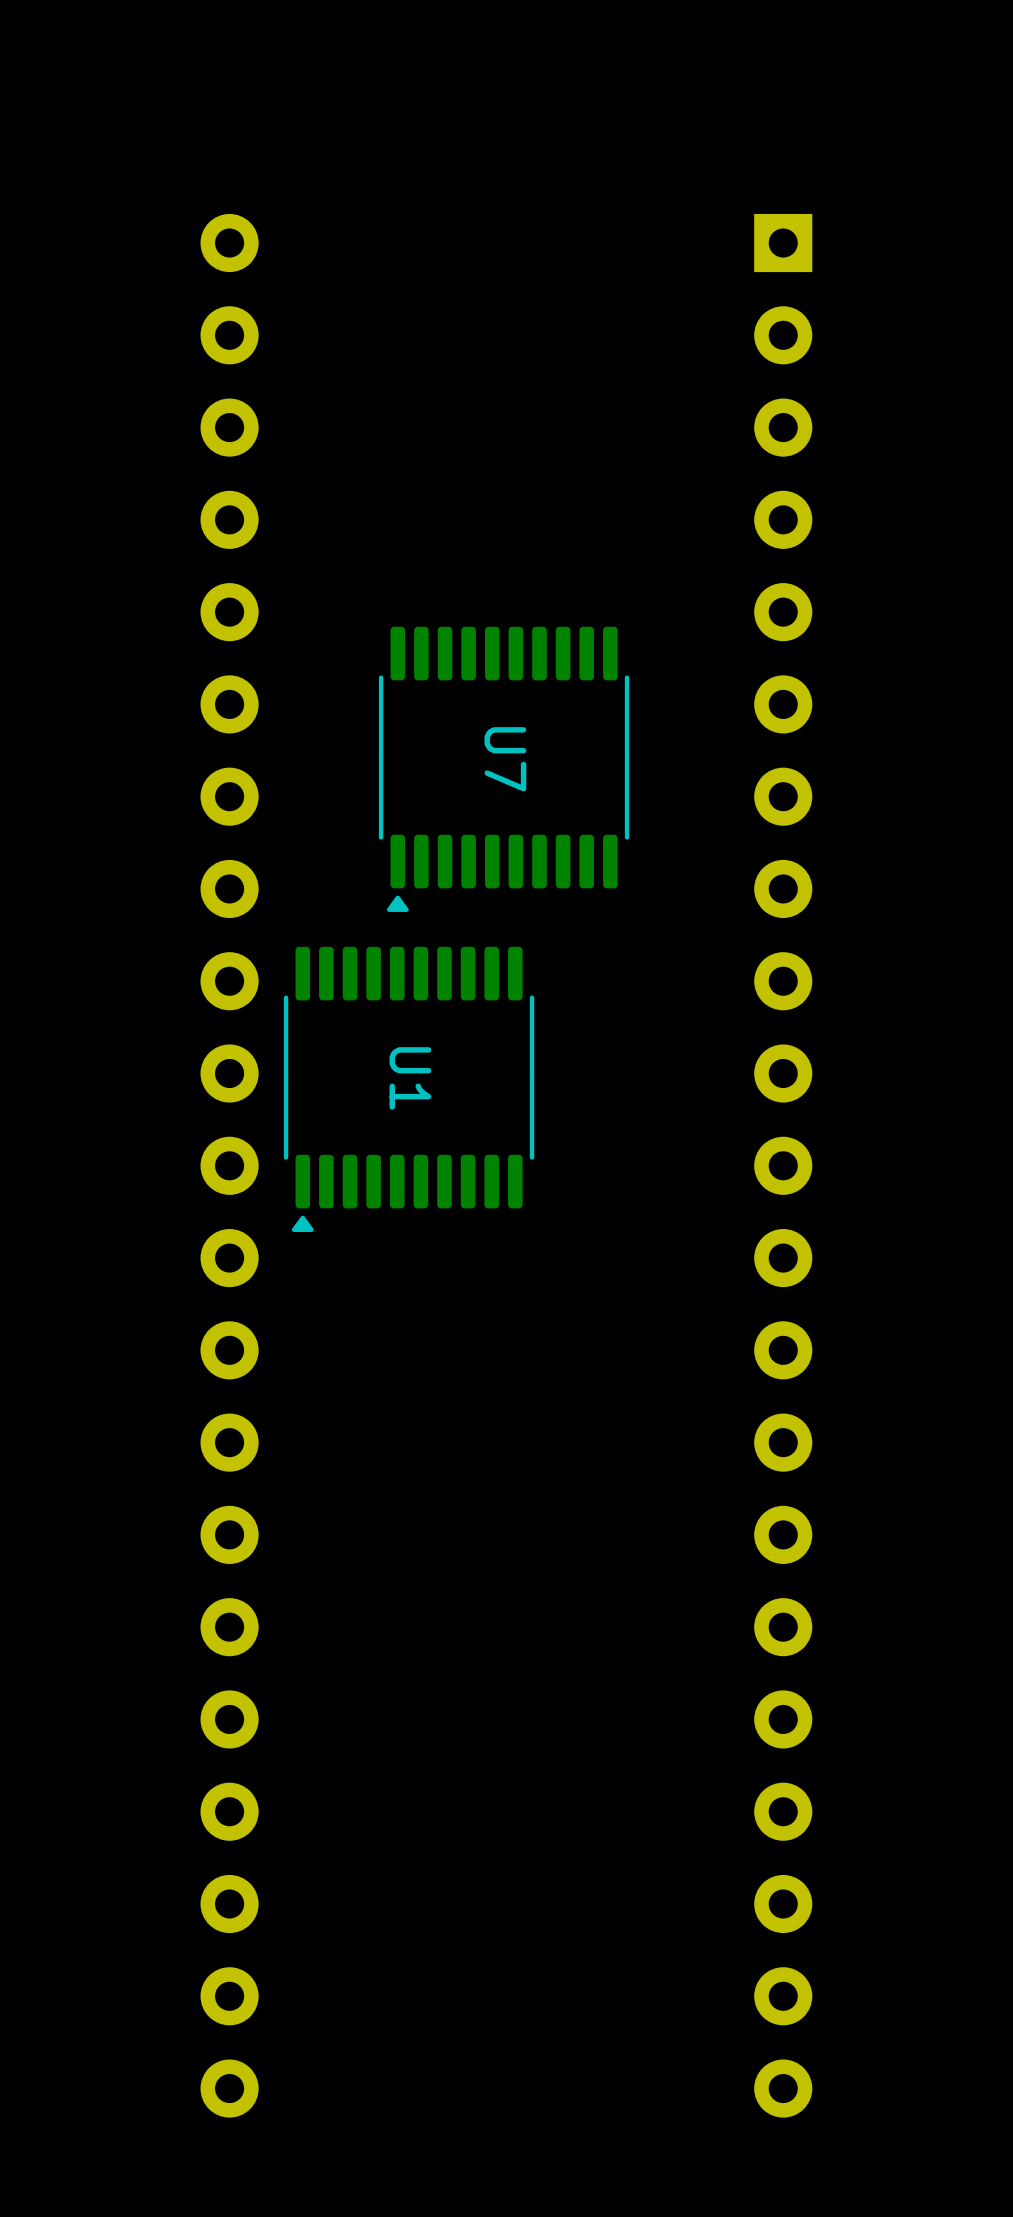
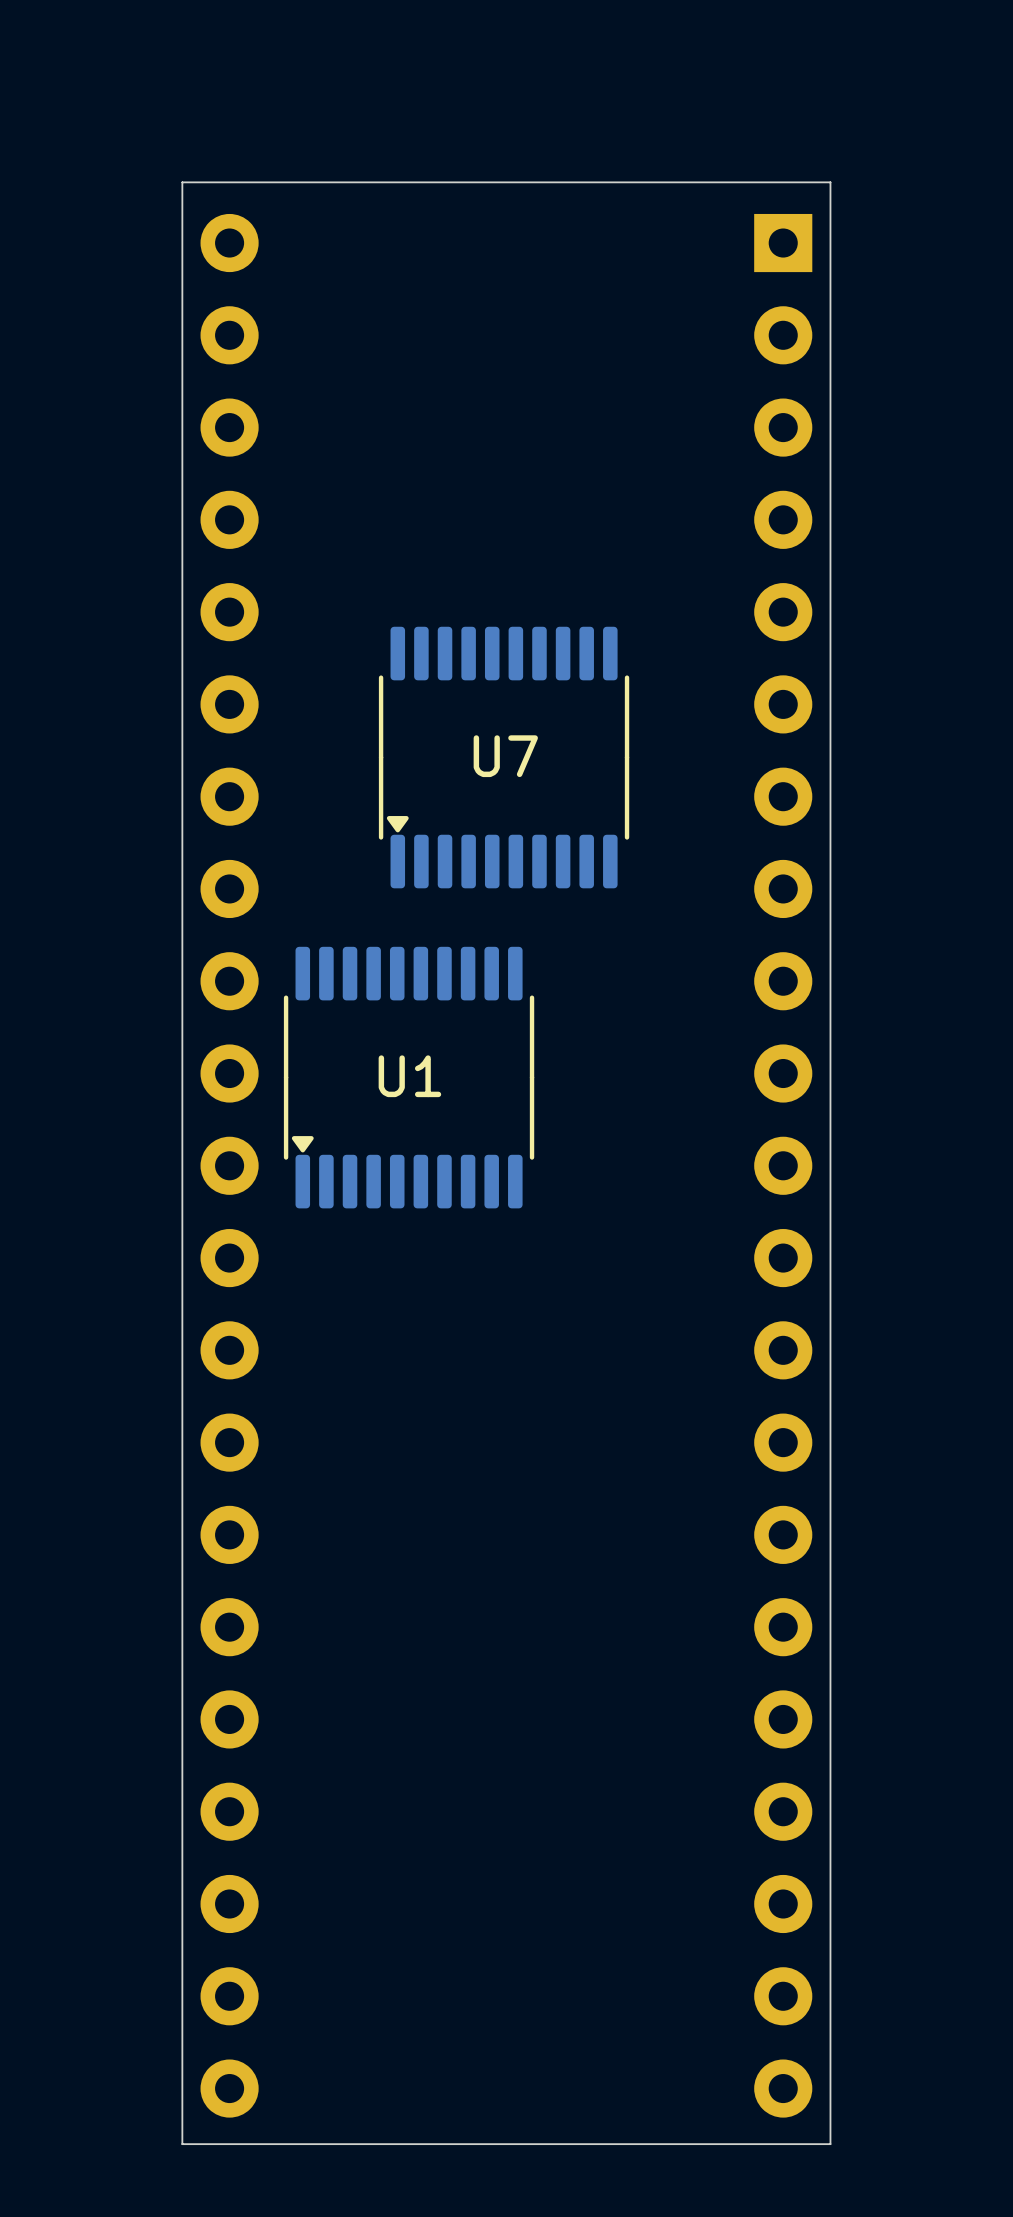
board edge: none -> (830, 182) (830, 2144) (182, 2144) (182, 182) (830, 182)
U7 footprint: [378, 626, 630, 912] -> [378, 626, 630, 889]
U1 footprint: [283, 946, 535, 1233] -> [283, 946, 535, 1209]

